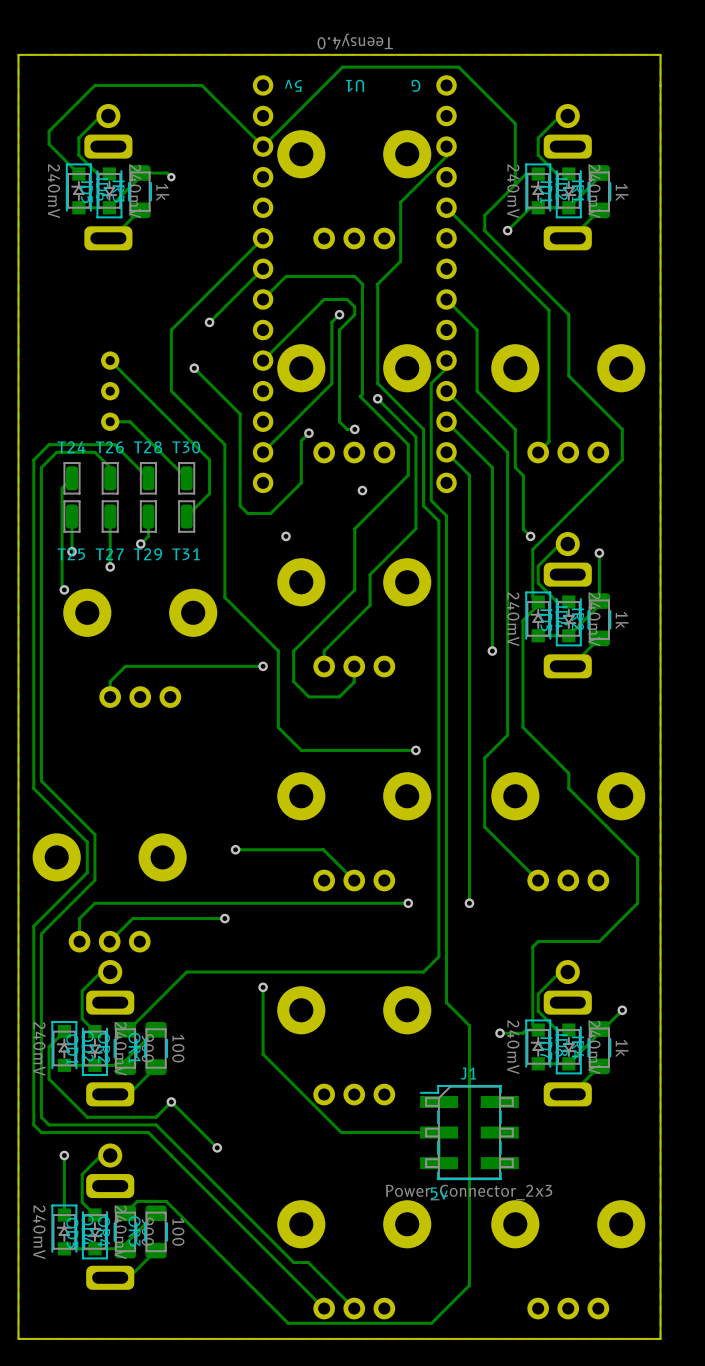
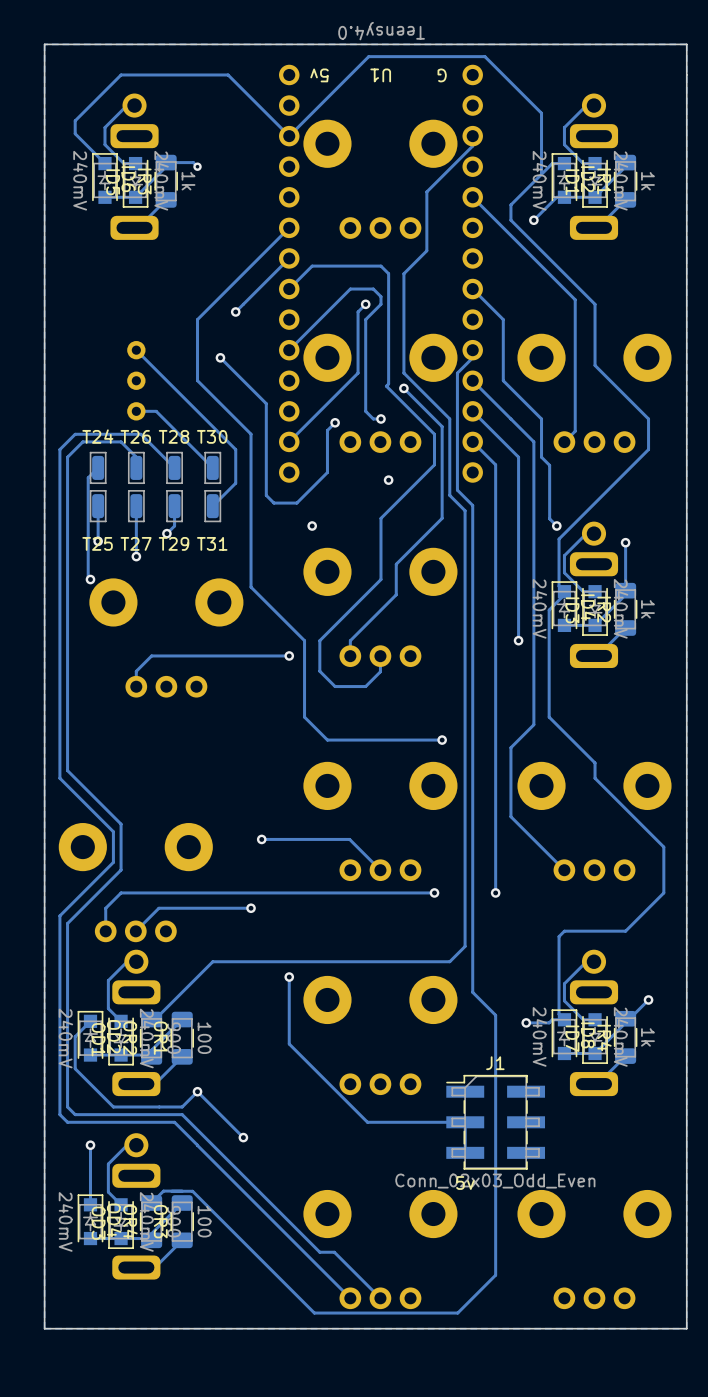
J1 value: Power_Connector_2x3 (469, 1192) -> Conn_02x03_Odd_Even (495, 1181)

